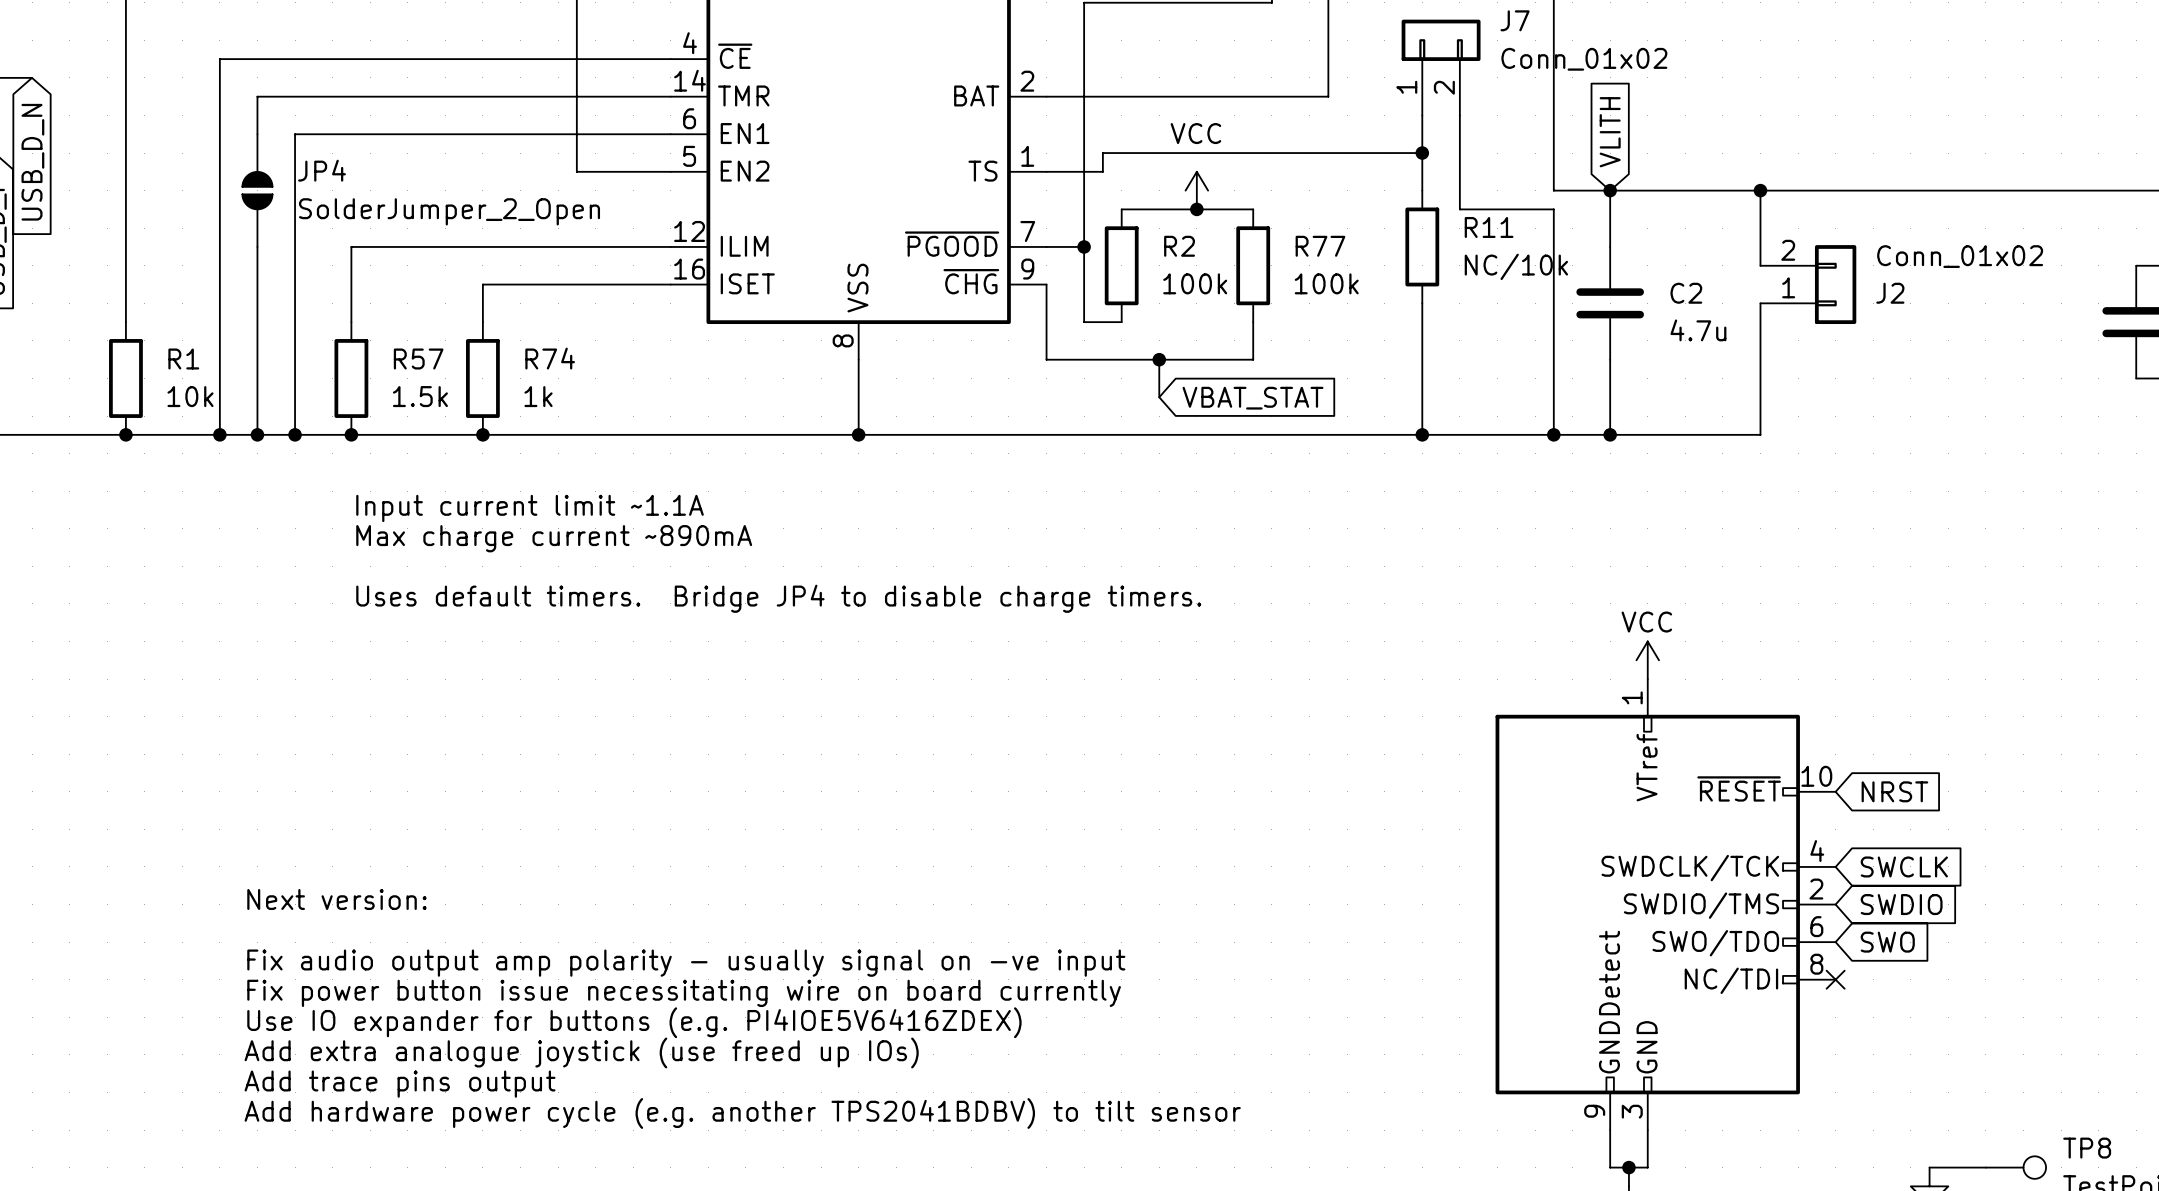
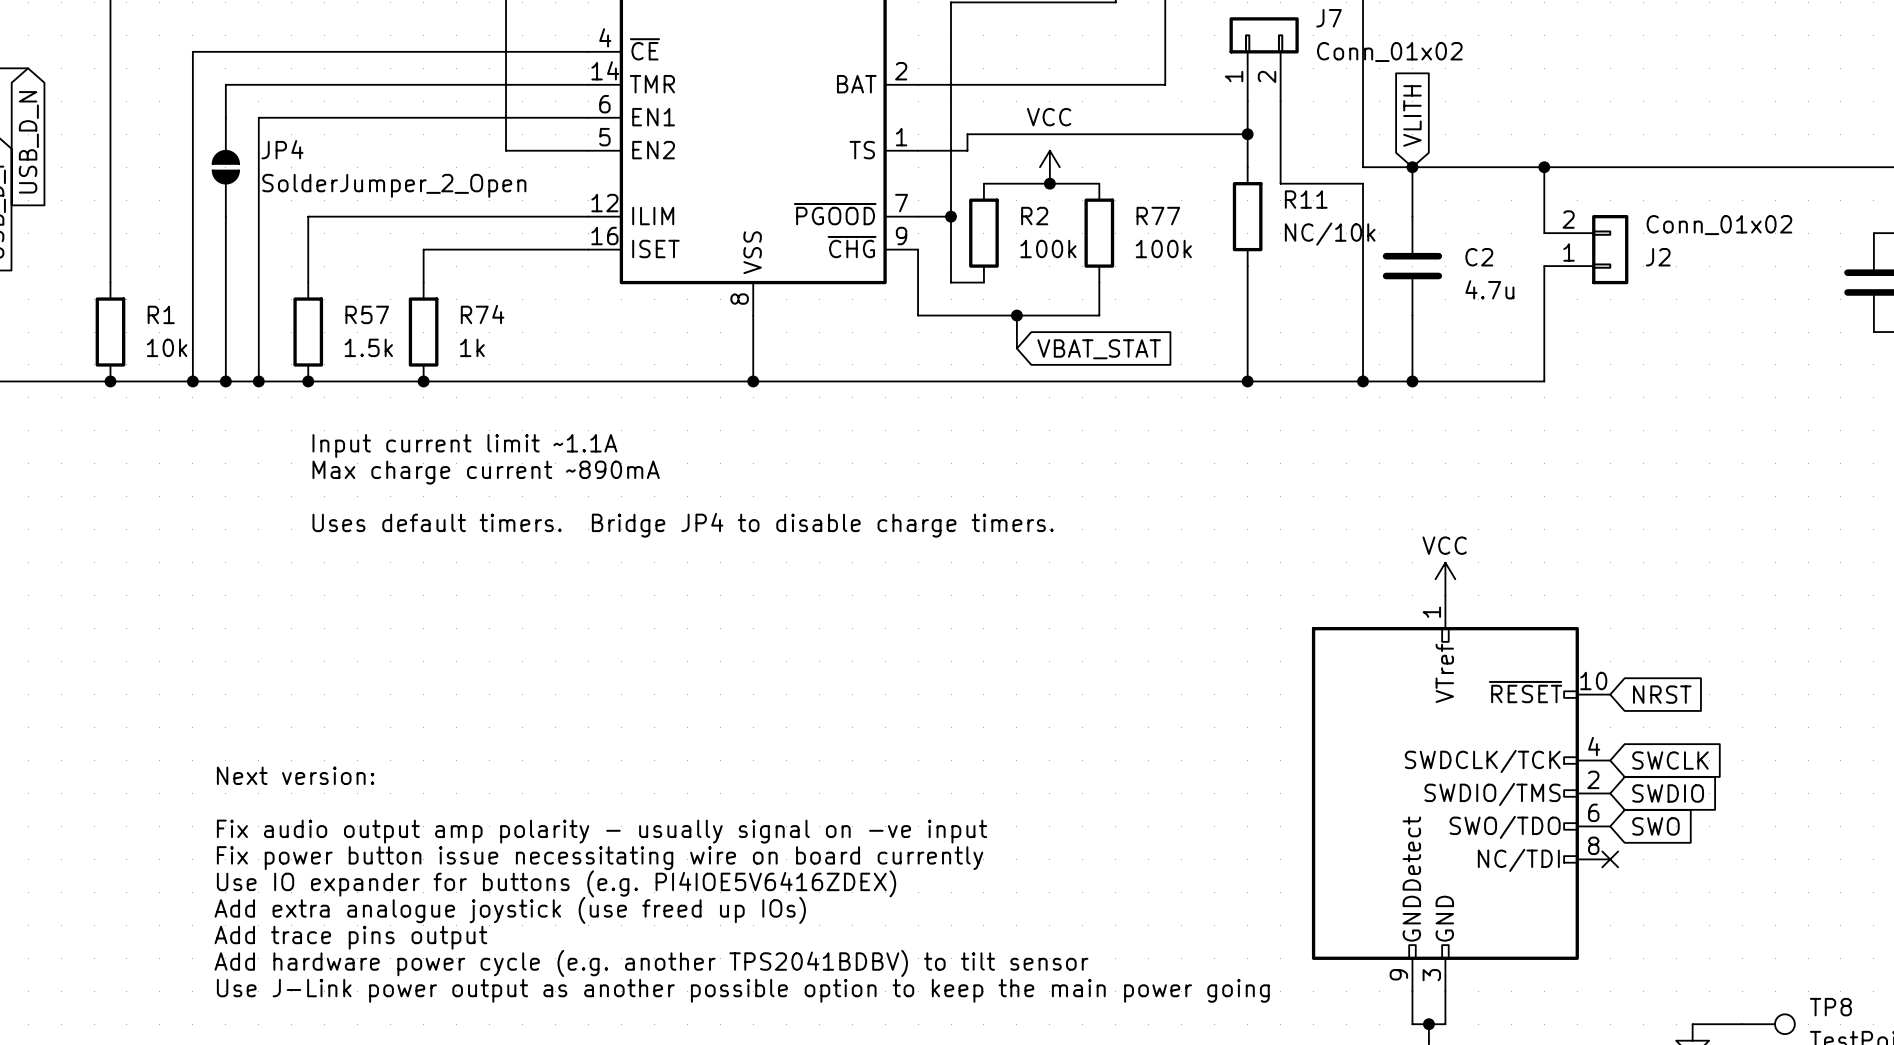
text position: Next version: (336, 899) -> Next version: (295, 775)
text position: Fix audio output amp polarity - usually signal on -ve input (686, 963) -> Fix audio output amp polarity - usually signal on -ve input (602, 831)
text position: Fix power button issue necessitating wire on board currently (684, 993) -> Fix power button issue necessitating wire on board currently (600, 858)
text position: Use IO expander for buttons (e.g. PI4IOE5V6416ZDEX) (634, 1022) -> Use IO expander for buttons (e.g. PI4IOE5V6416ZDEX) (556, 883)
text position: Add extra analogue joystick (use freed up IOs) (581, 1052) -> Add extra analogue joystick (use freed up IOs) (510, 910)
text position: Add trace pins output (400, 1084) -> Add trace pins output (350, 937)
text position: Add hardware power cycle (e.g. another TPS2041BDBV) to tilt sensor (742, 1113) -> Add hardware power cycle (e.g. another TPS2041BDBV) to tilt sensor (651, 963)
text: none -> Use J-Link power output as another possible option to keep the main power going (743, 990)

